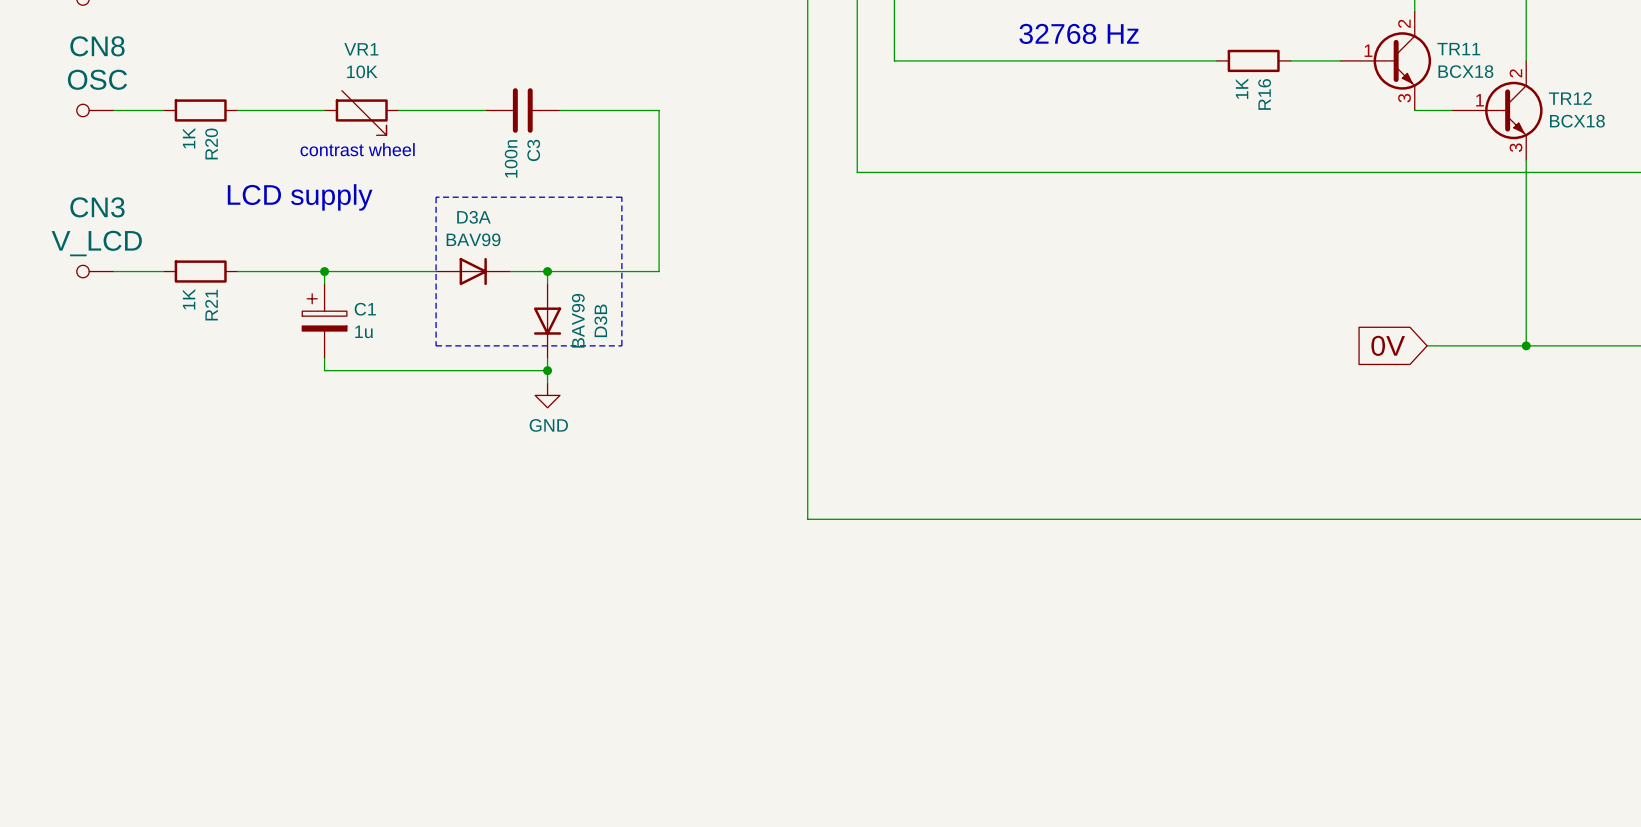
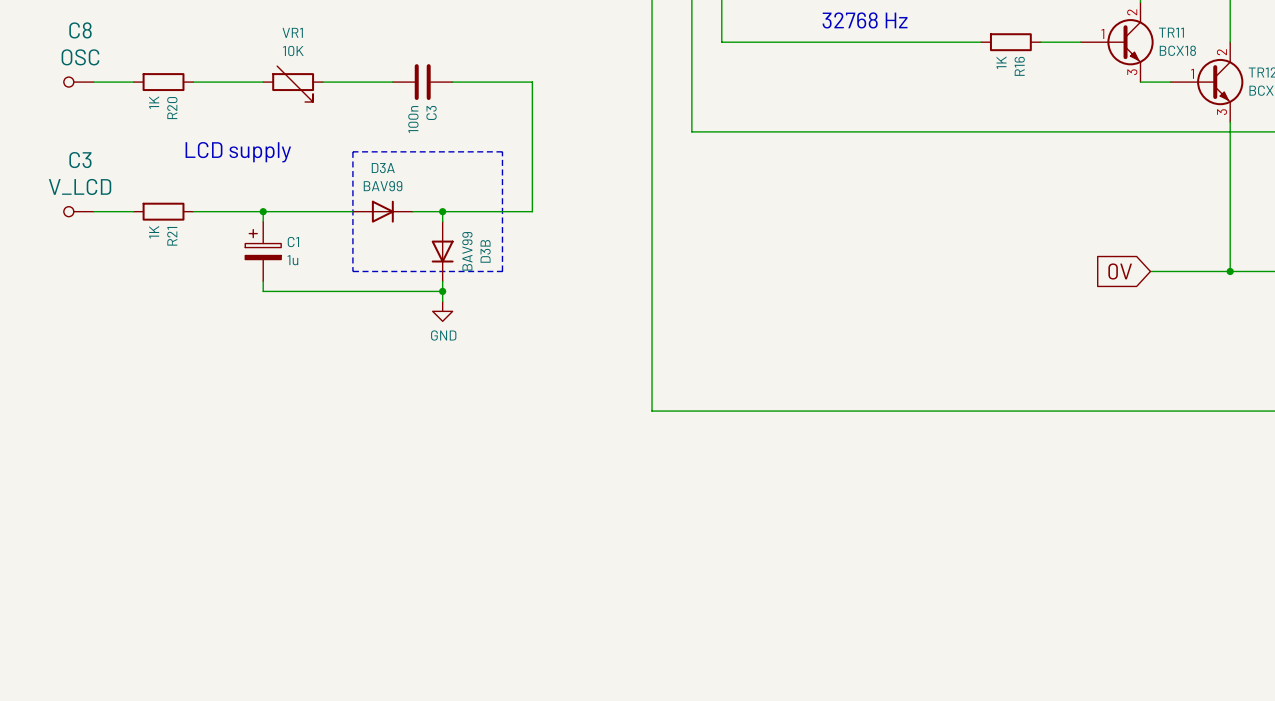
CN8 name: CN8 (97, 46) -> C8 (80, 30)
text: contrast wheel (357, 149) -> none
CN3 name: CN3 (97, 207) -> C3 (80, 160)

